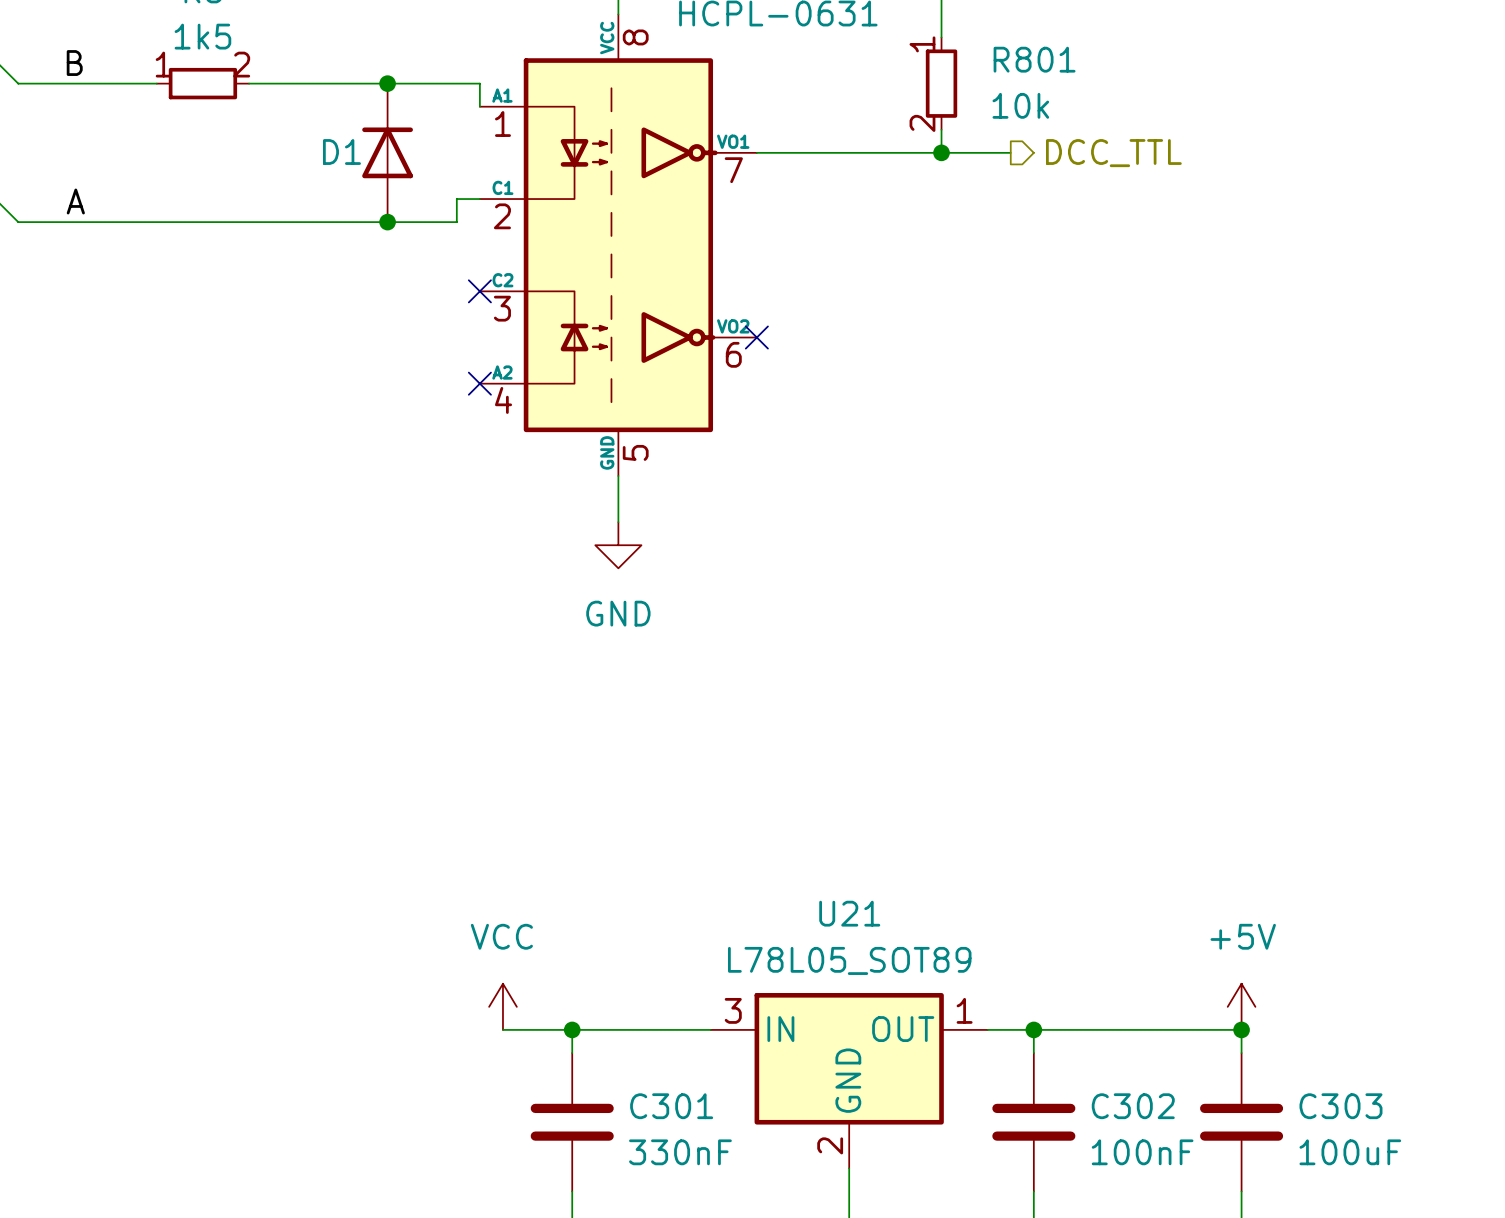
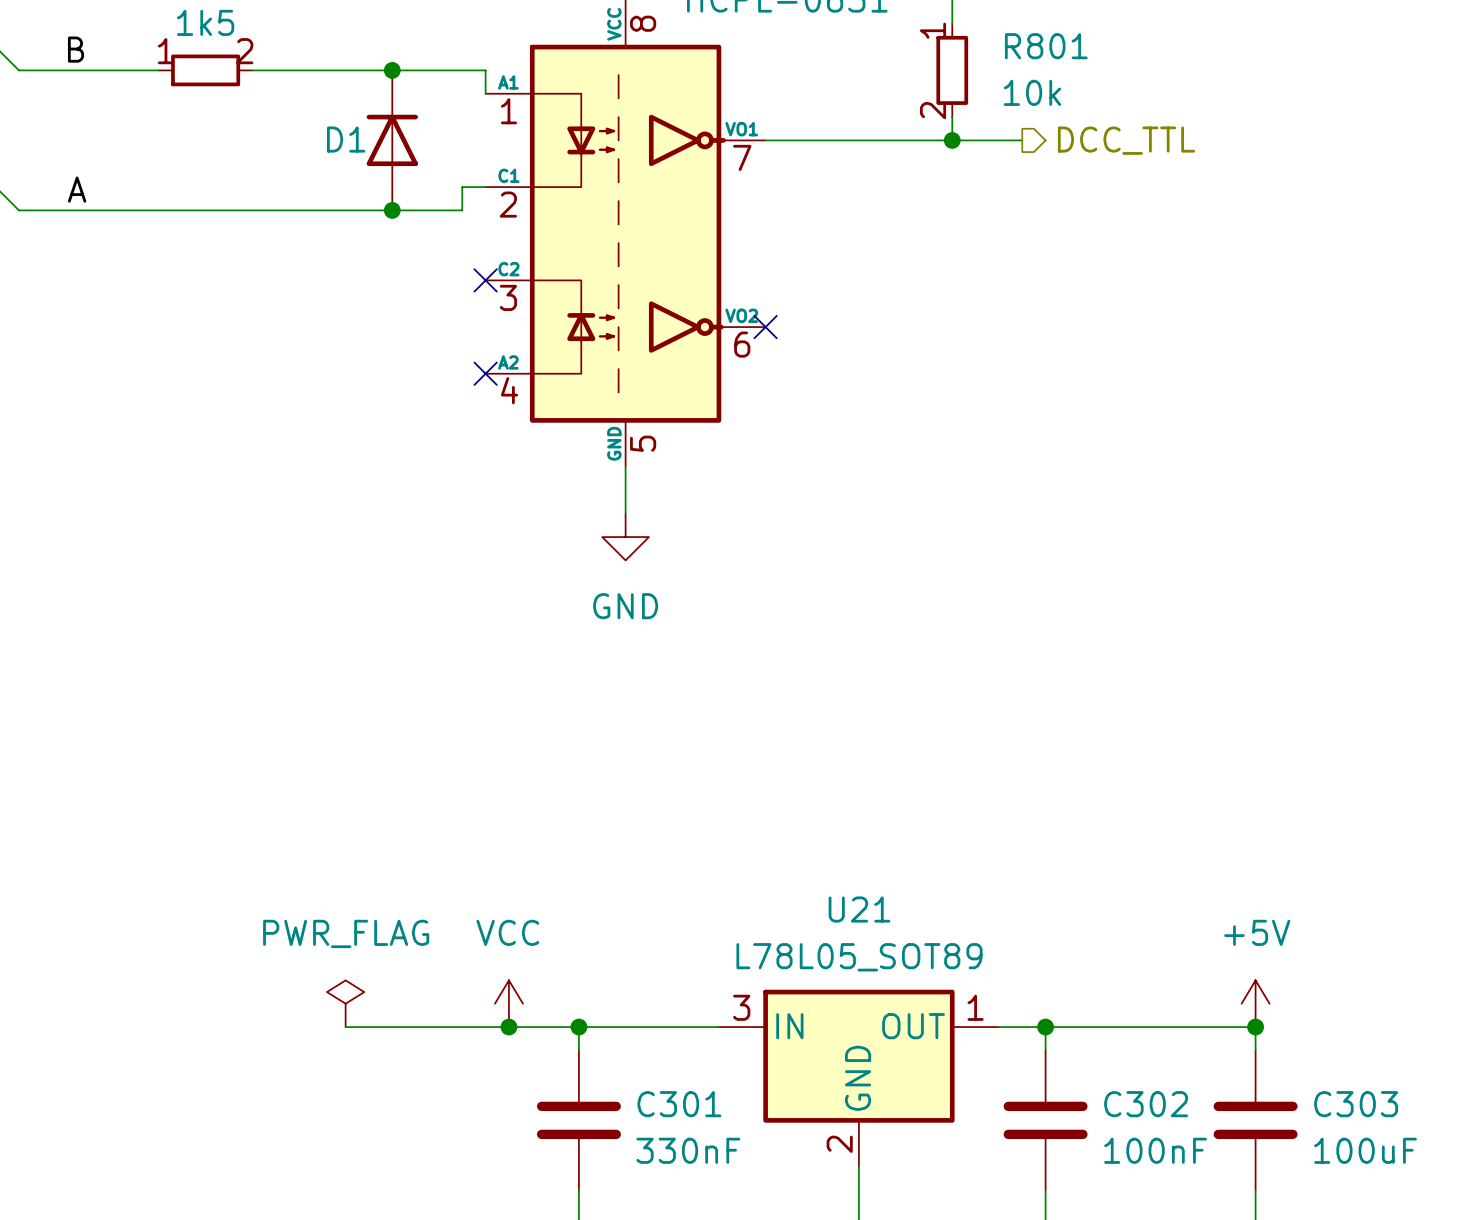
power symbol: none -> PWR_FLAG (345, 1003)
wire: none -> (345, 1027) (508, 1027)
junction: none -> (508, 1027)

